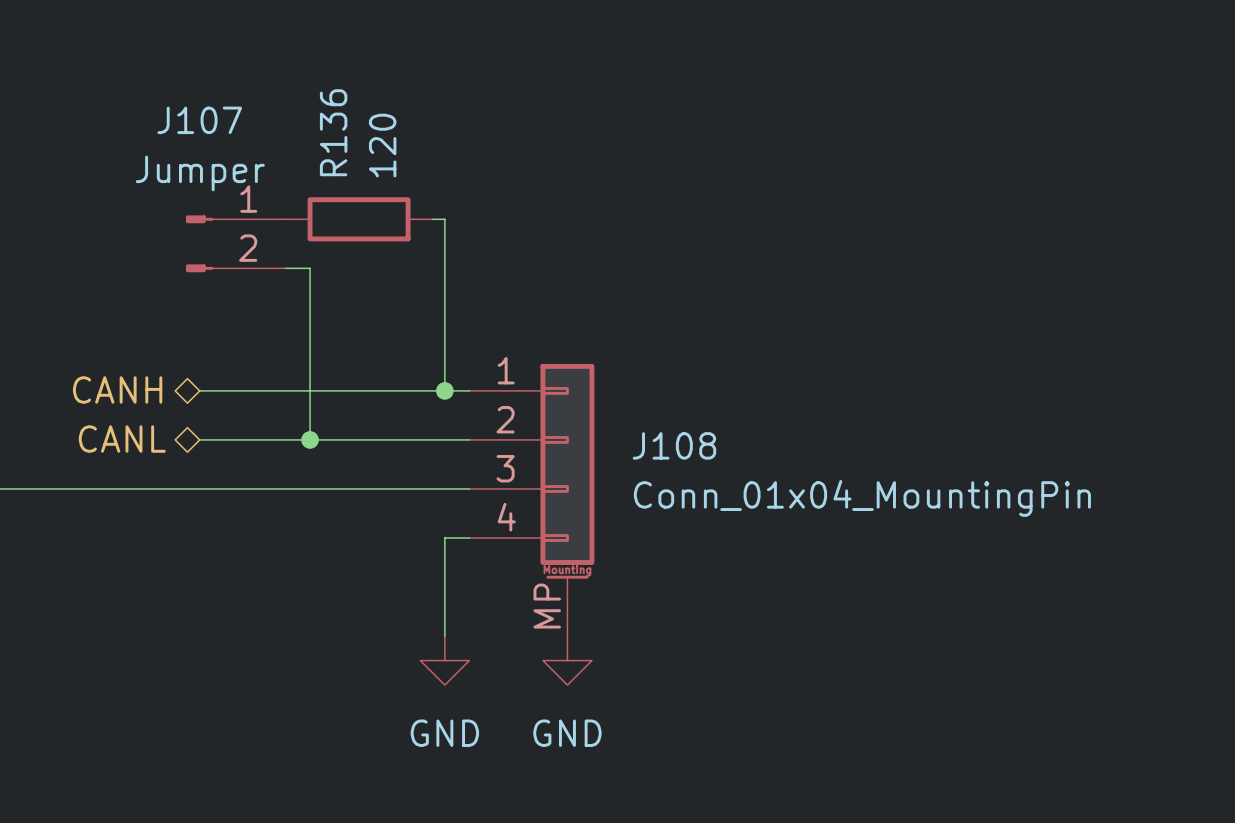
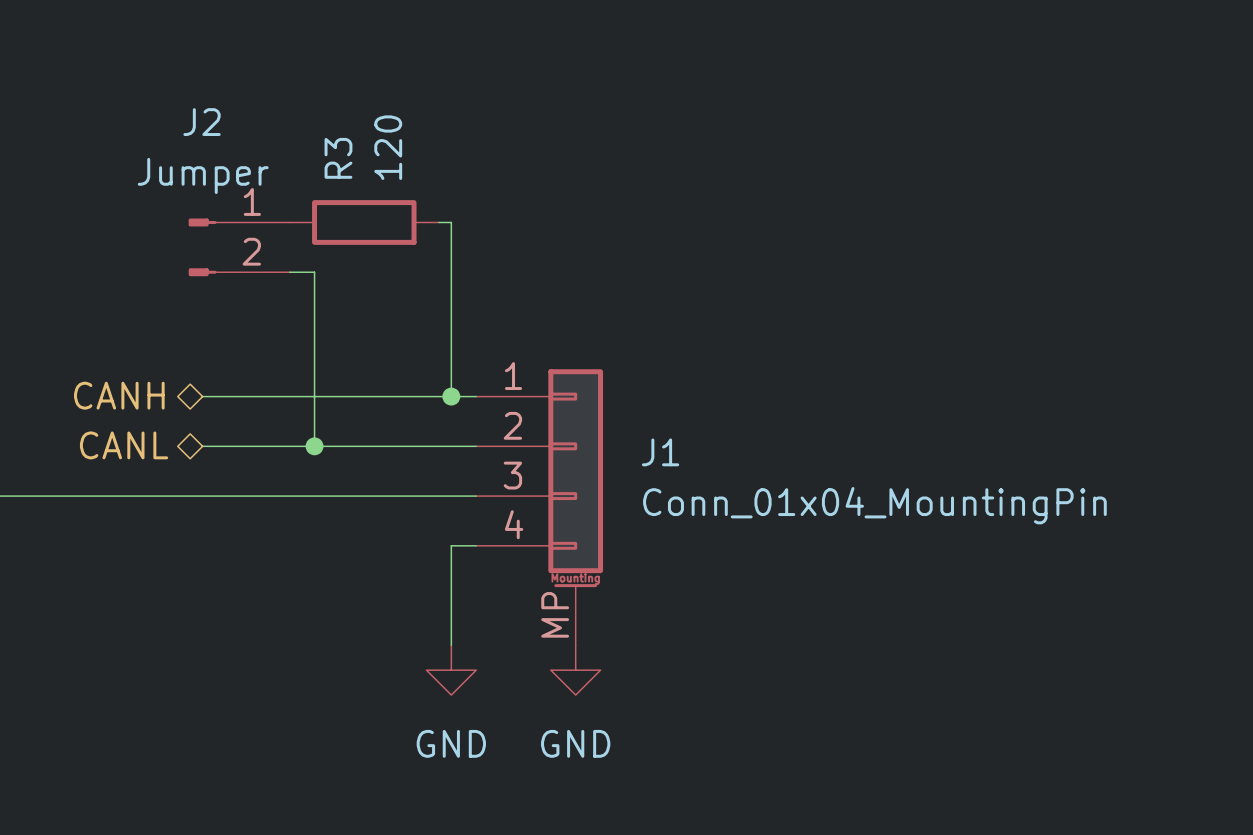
J107 name: J107 (199, 120) -> J2 (202, 122)
R136 name: R136 (333, 132) -> R3 (338, 158)
J108 name: J108 (674, 445) -> J1 (660, 452)

